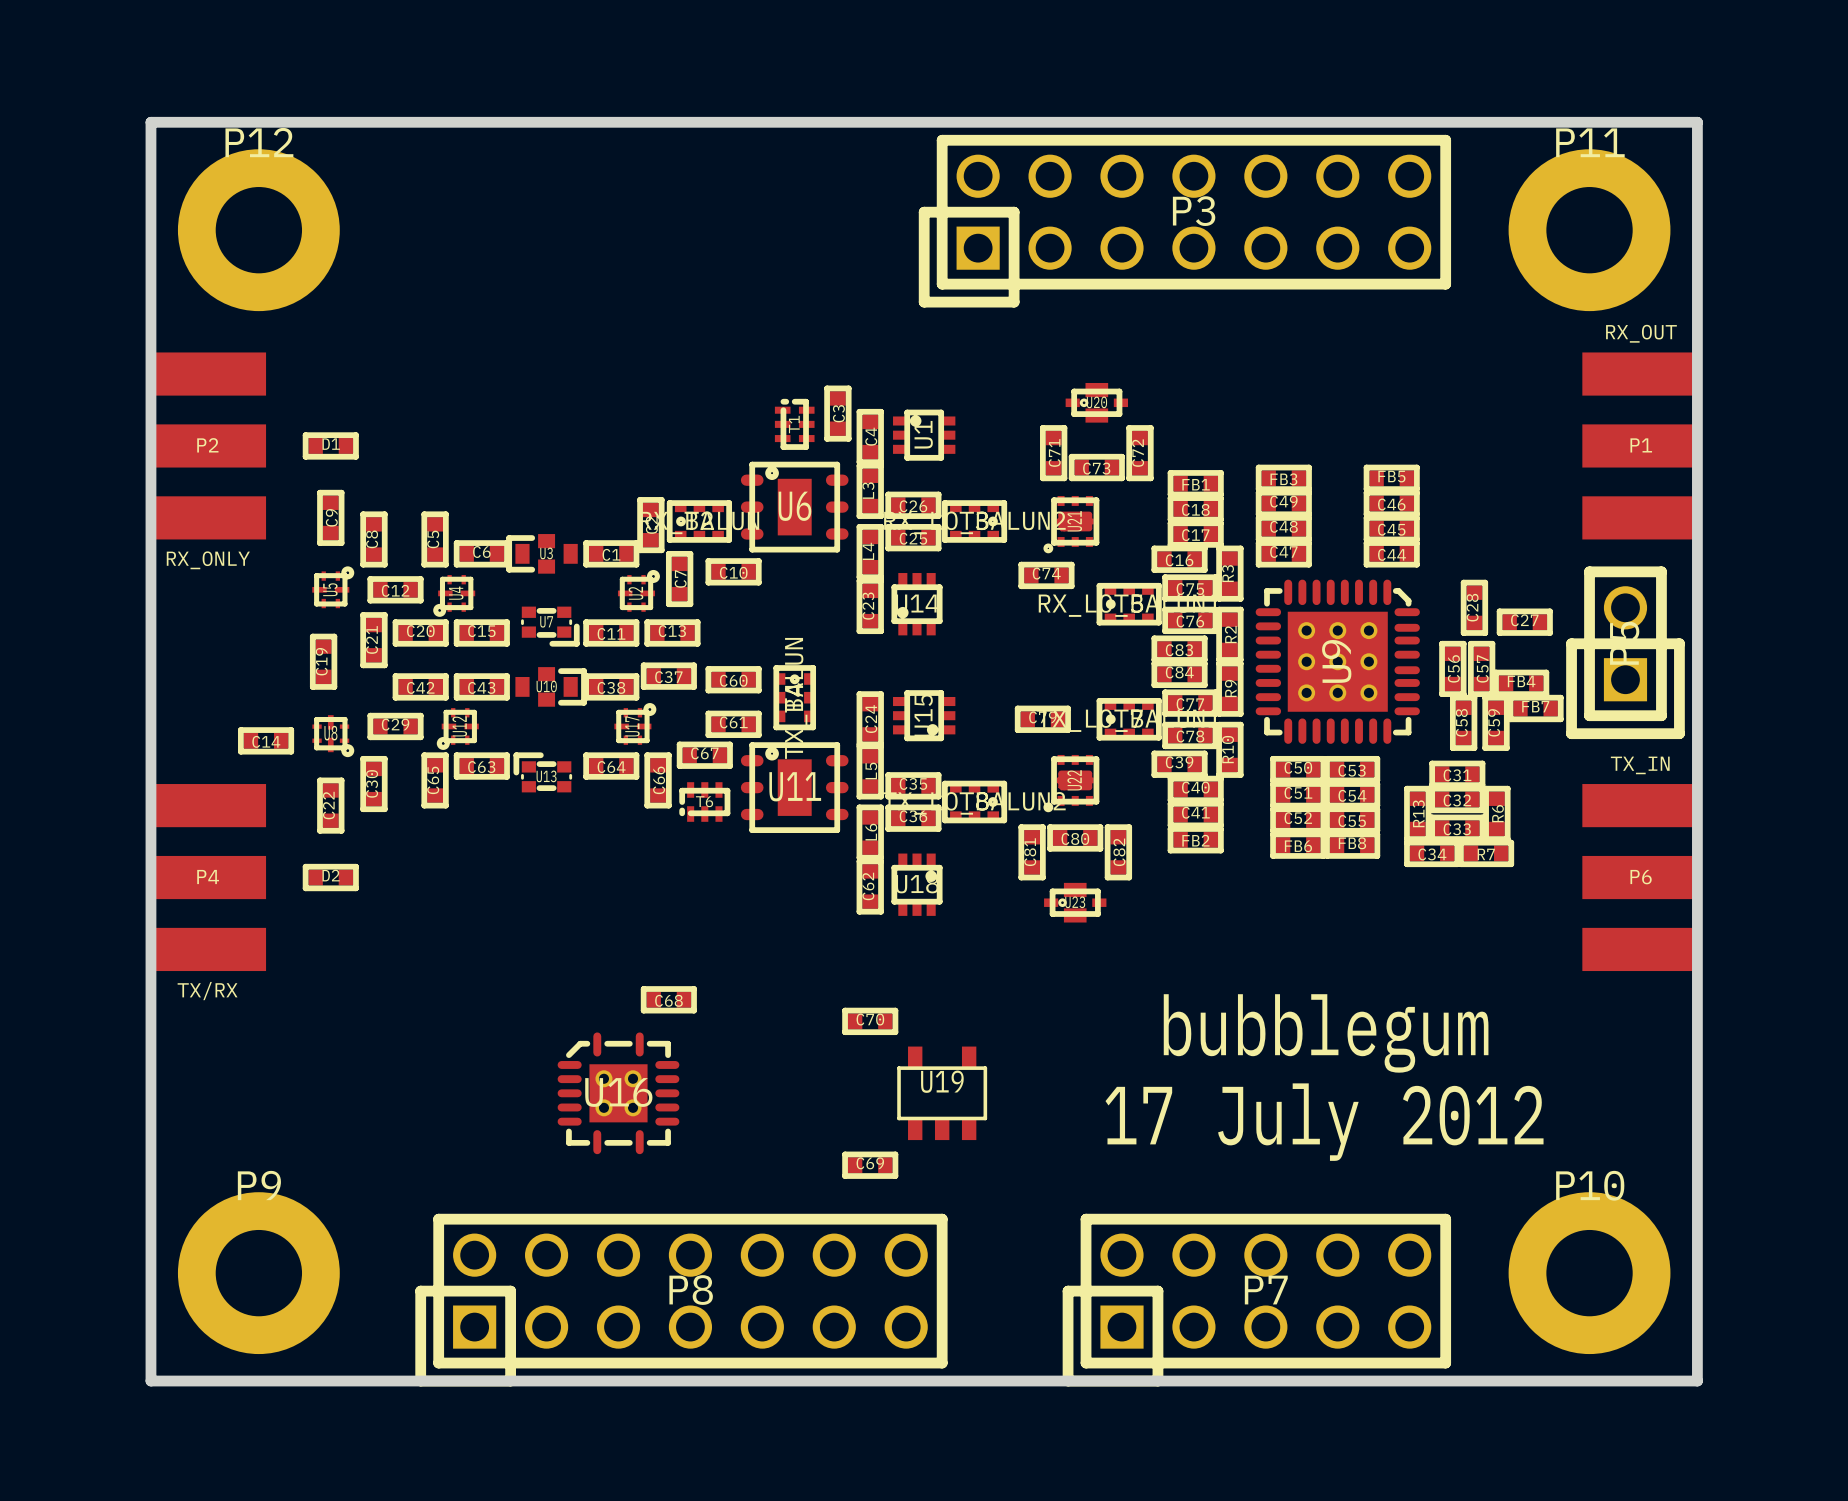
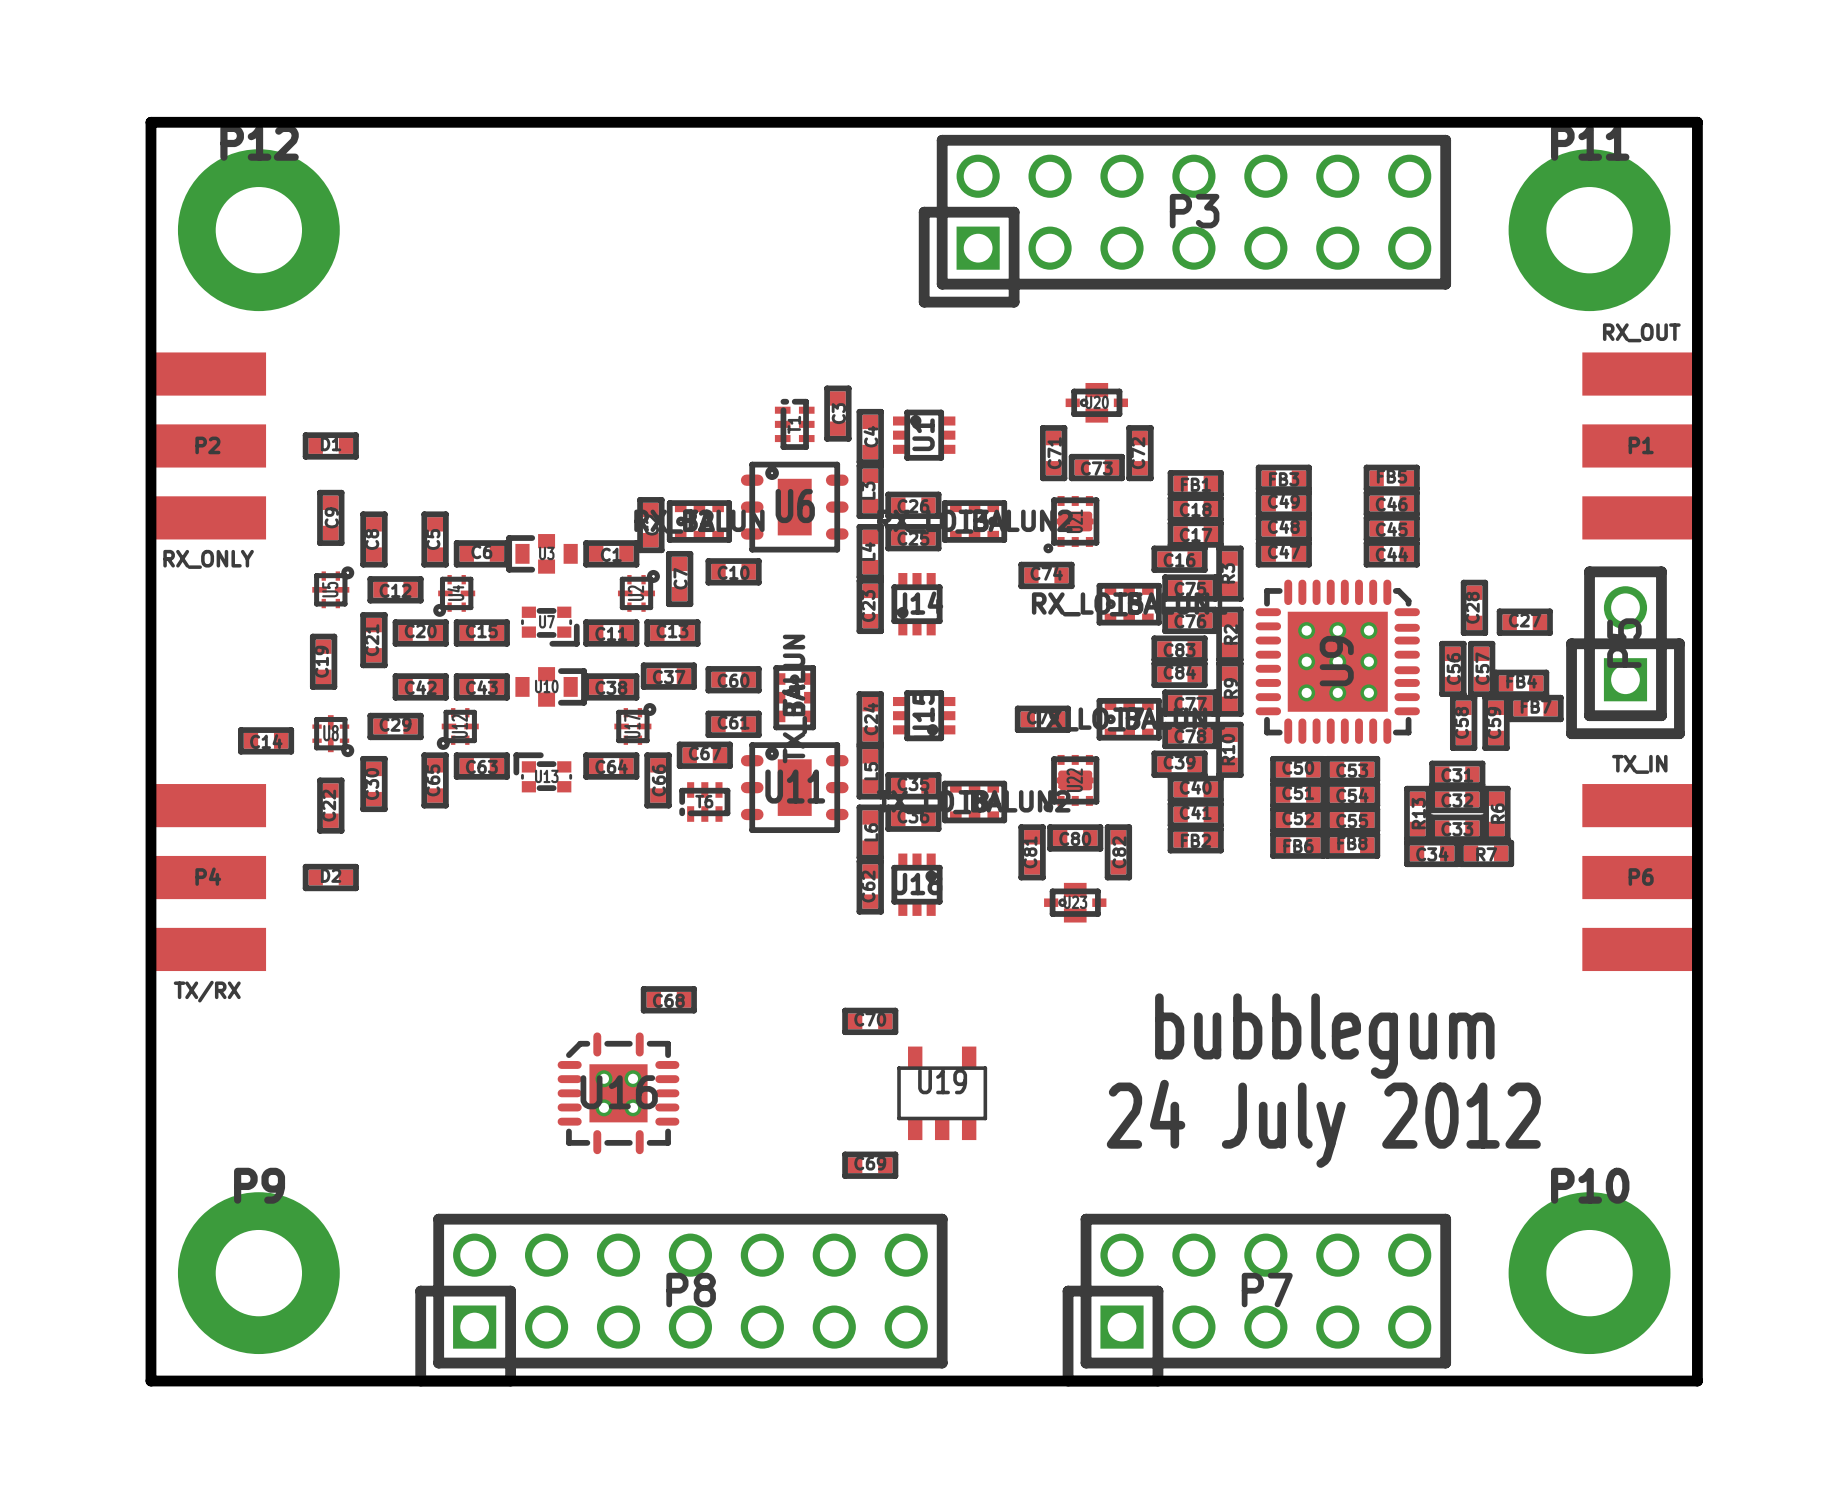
text: 17 July 2012 (1324, 1122) -> 24 July 2012 (1323, 1123)

